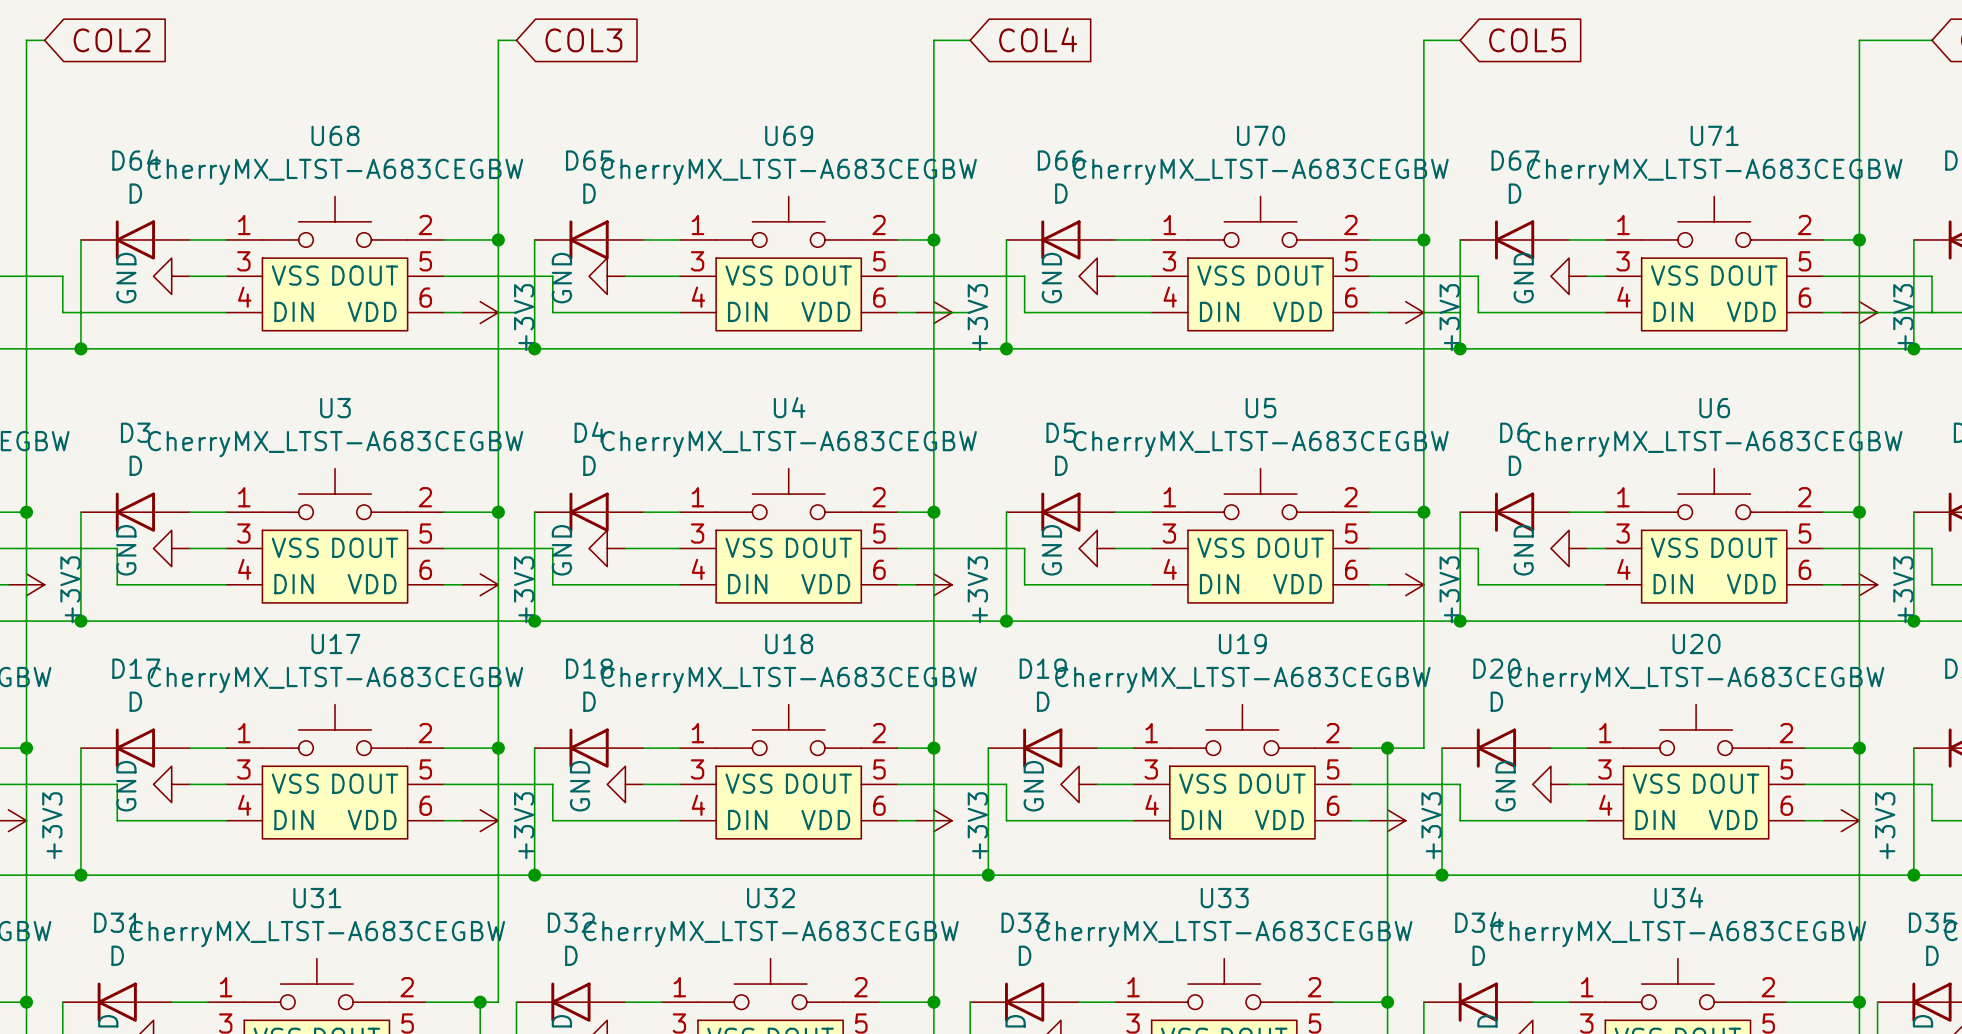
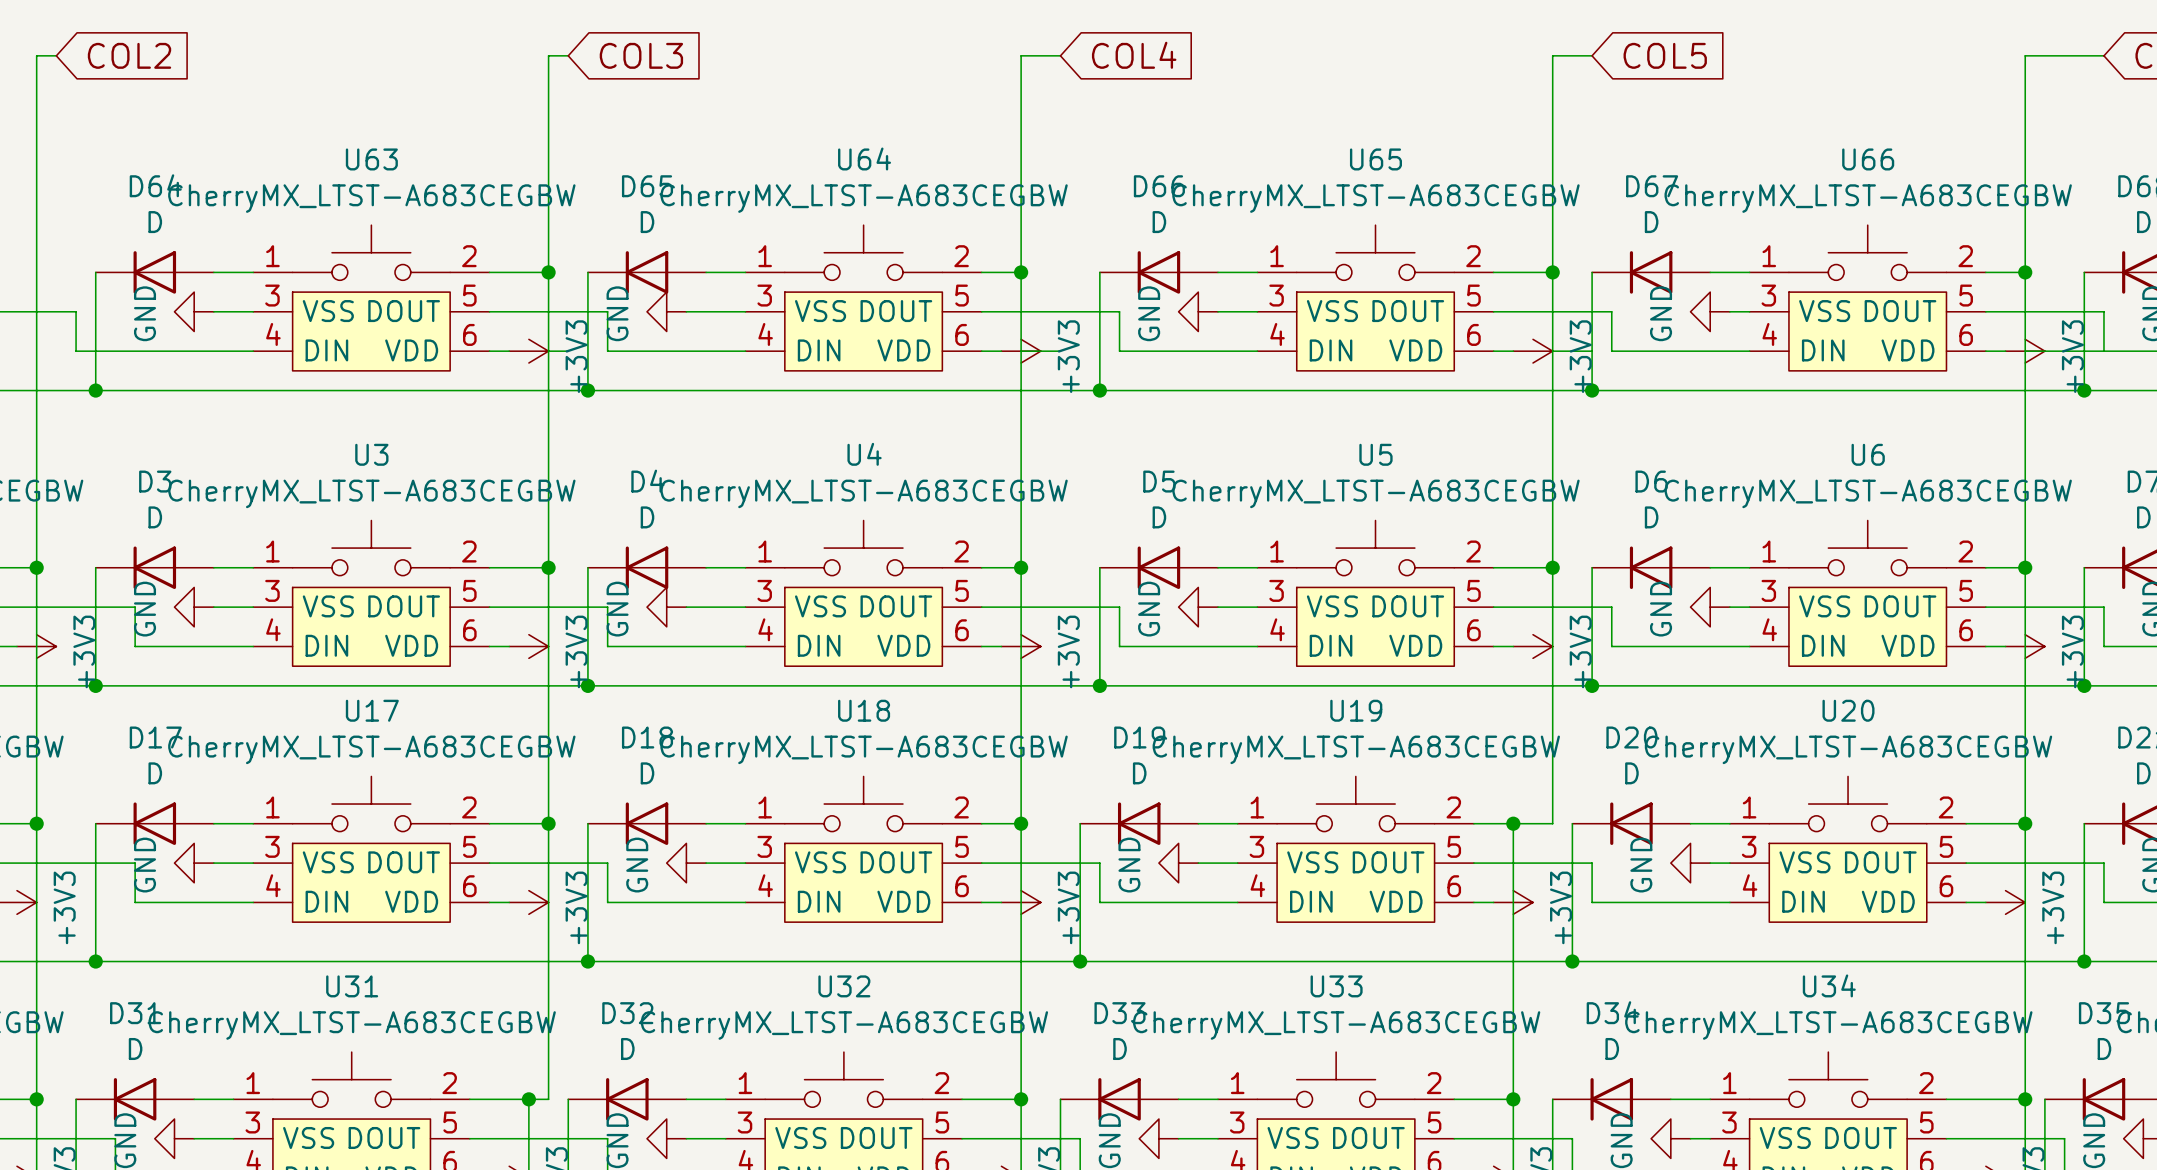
U68 name: U68 (335, 135) -> U63 (371, 159)
U69 name: U69 (789, 135) -> U64 (864, 158)
U70 name: U70 (1260, 135) -> U65 (1375, 159)
U71 name: U71 (1714, 135) -> U66 (1868, 159)

